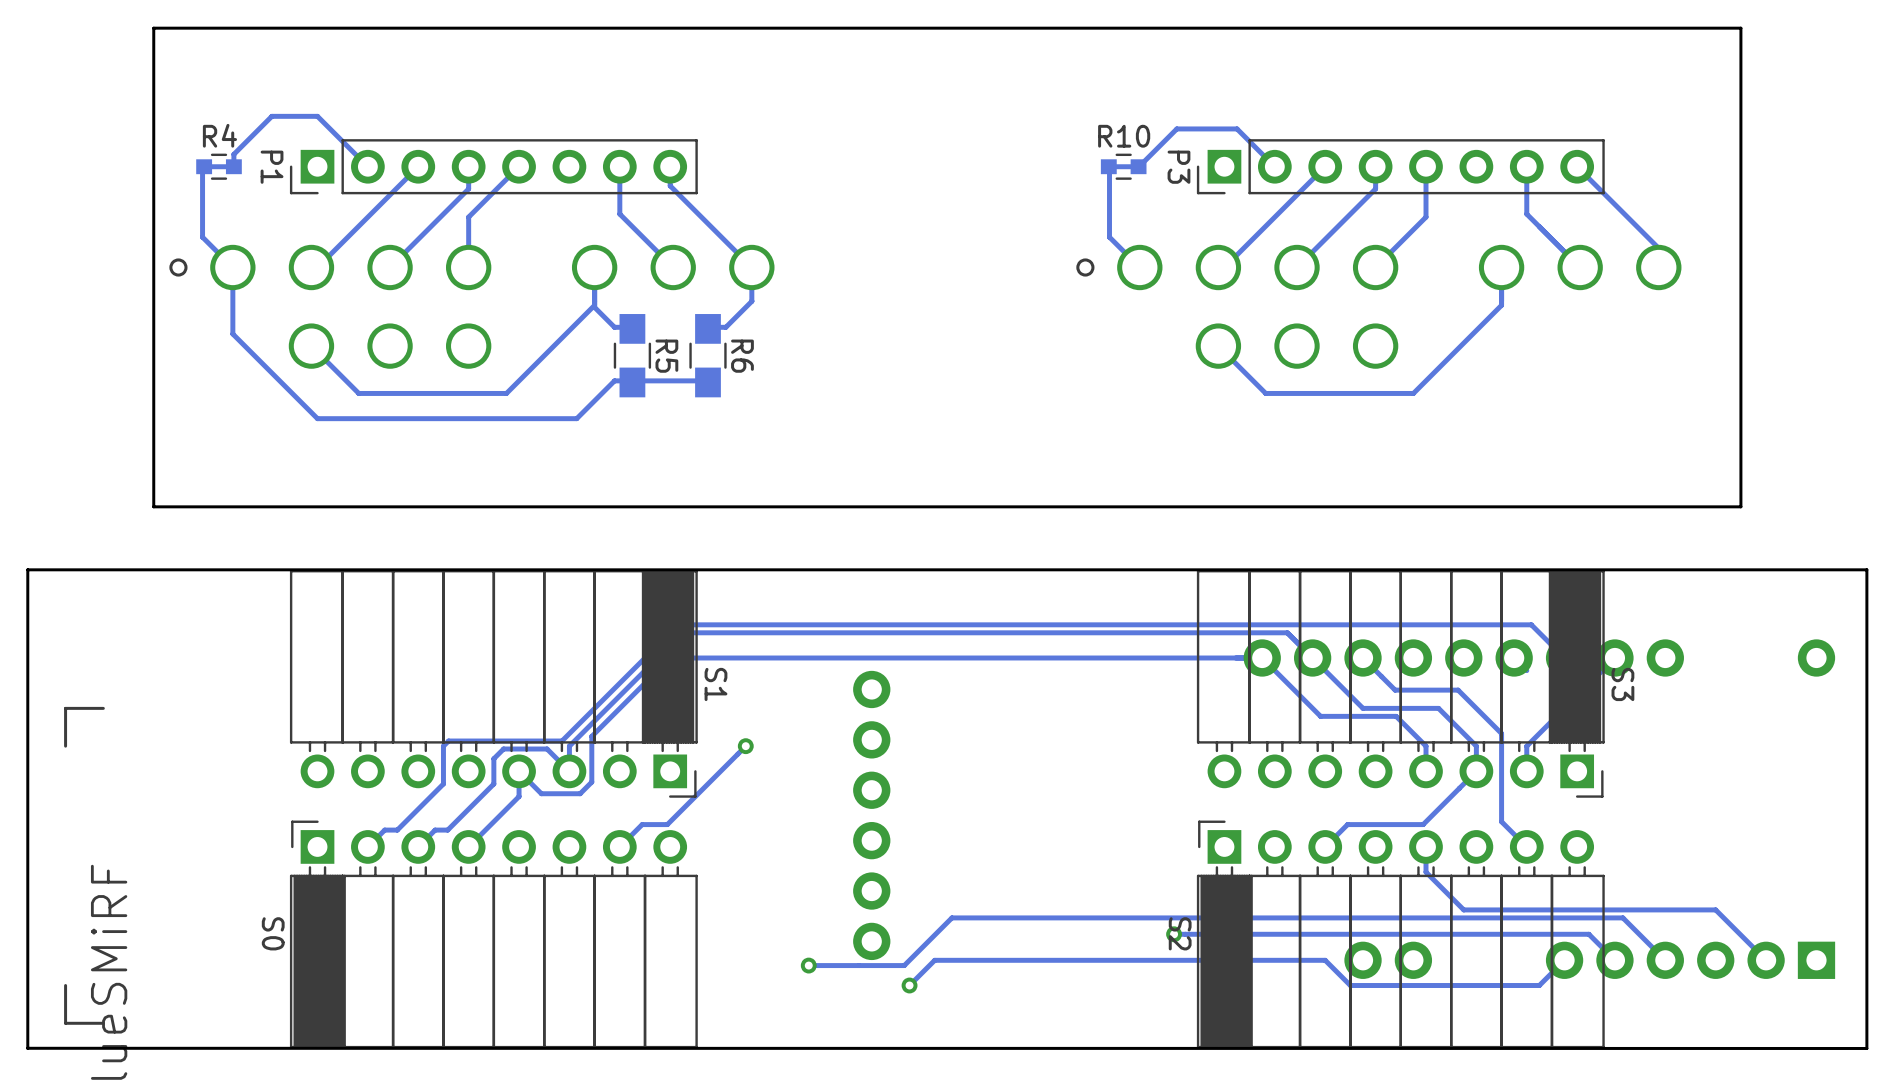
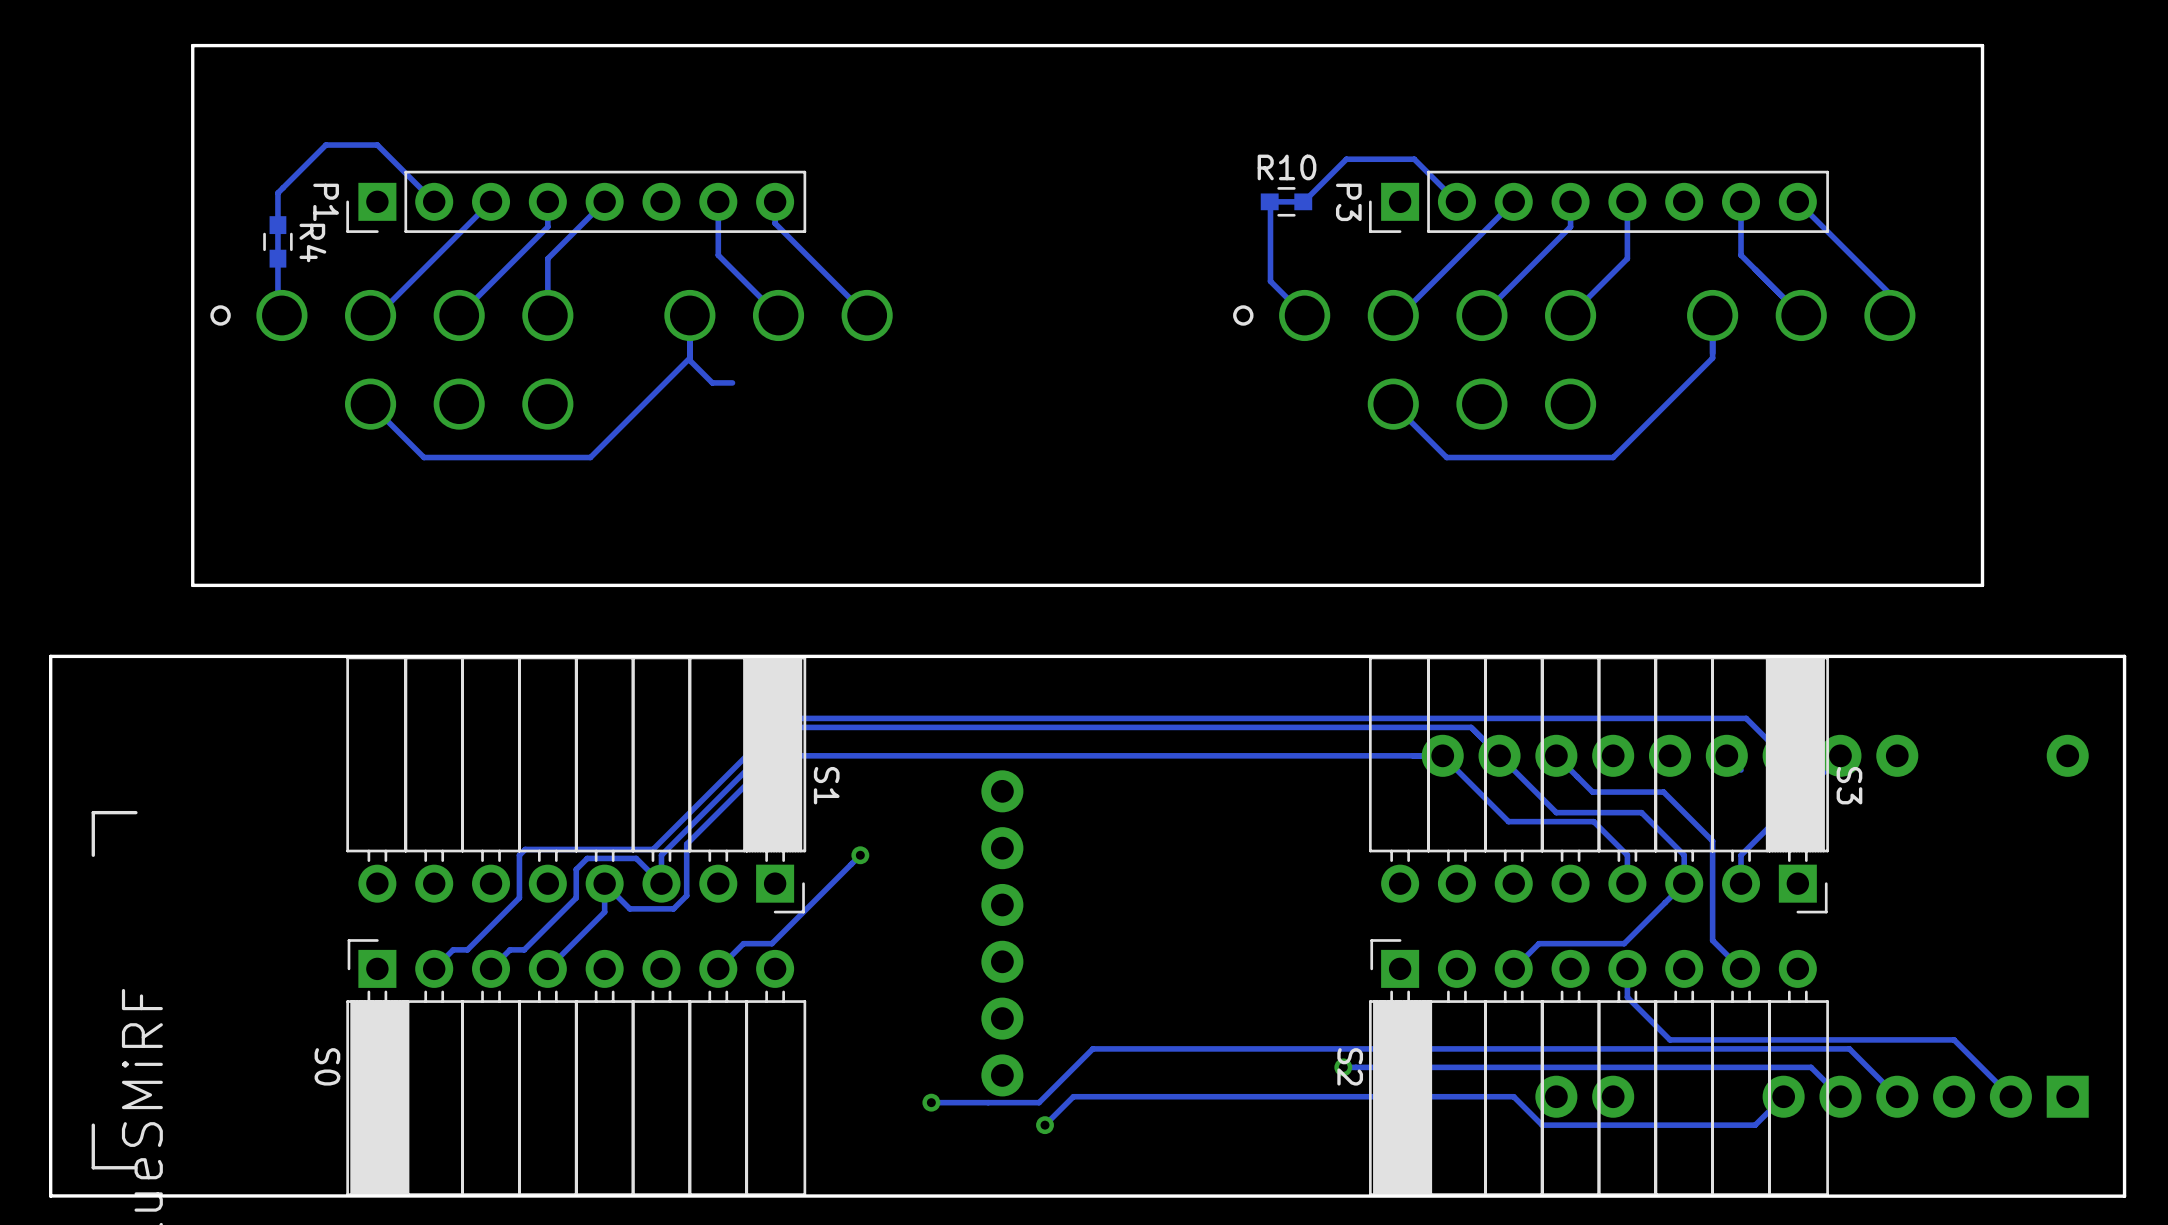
track: (233, 154) (233, 166) (204, 166) -> none
track: (202, 166) (202, 237) (229, 263) -> (283, 187) (277, 193) (277, 311)
R4 rotation: 0° (219, 166) -> 90° clockwise (277, 241)
R4 position: (219, 166) -> (277, 241)
track: (232, 267) (232, 334) (317, 418) (576, 418) (614, 380) (708, 380) -> none
track: (751, 267) (751, 301) (725, 327) (708, 327) -> none
R5: (632, 355) -> none
R6: (708, 355) -> none

